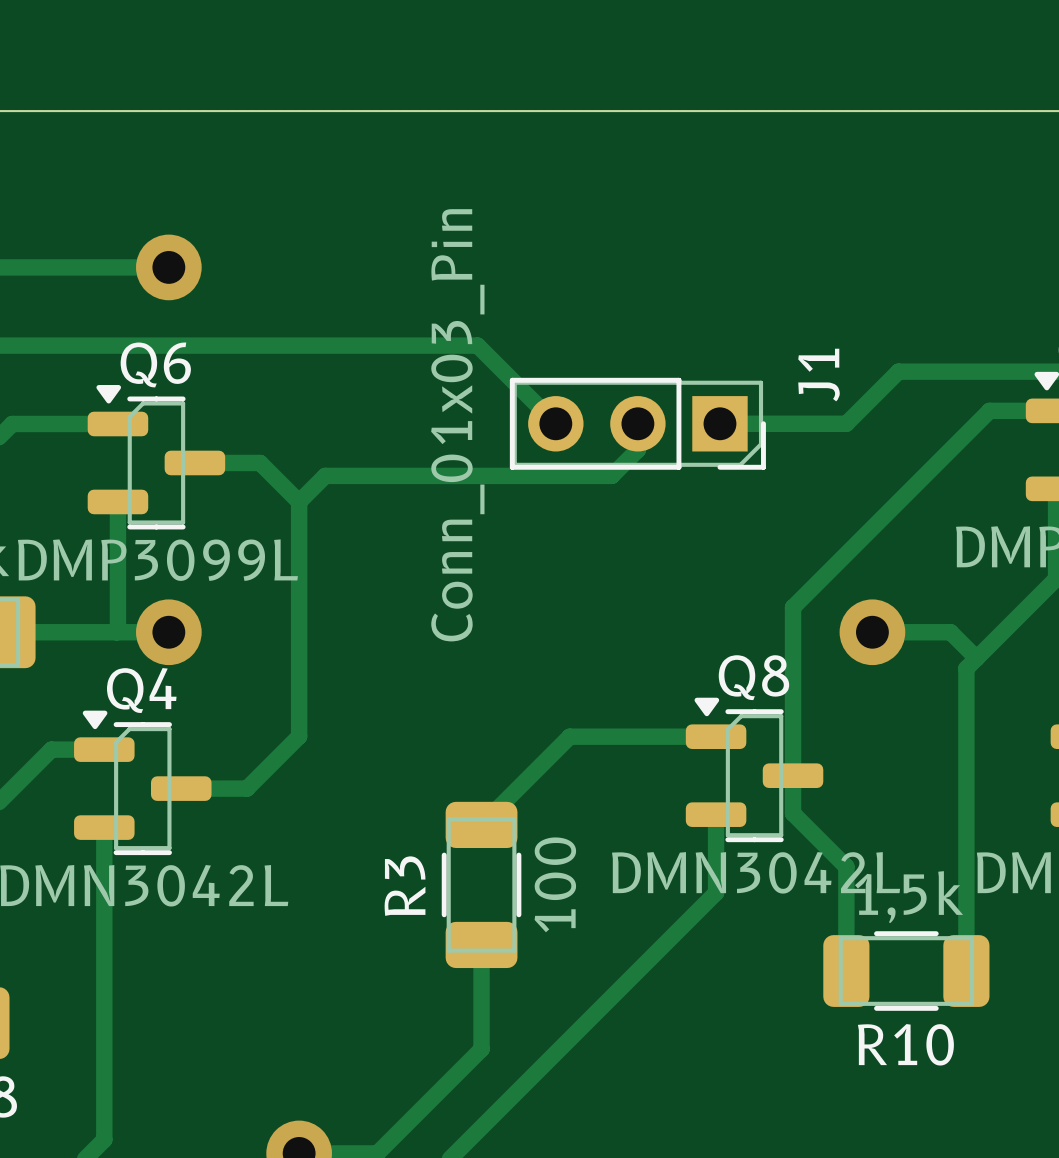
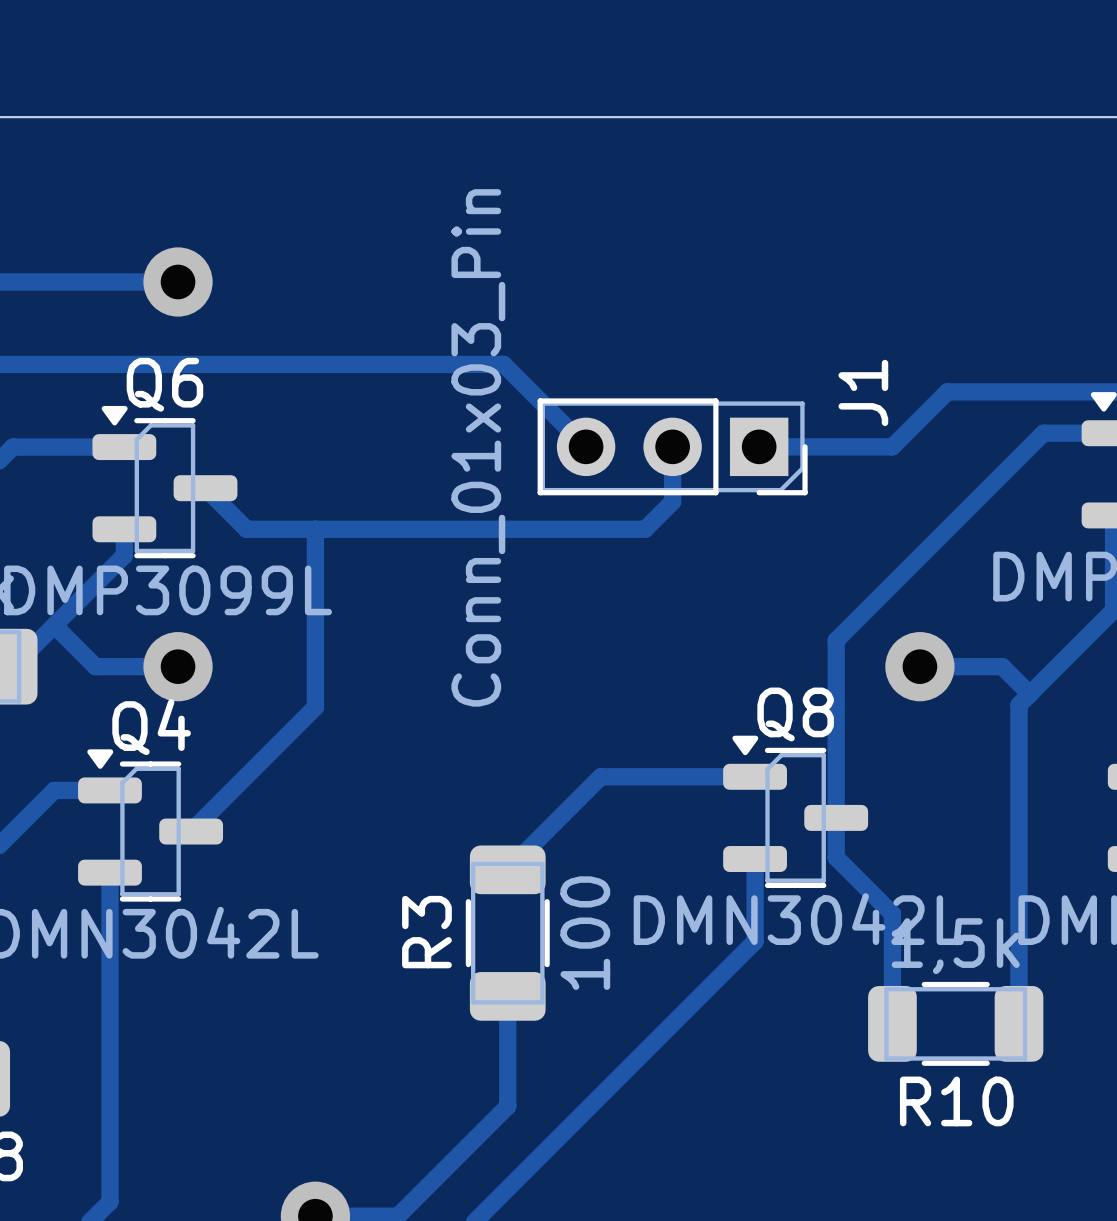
track: (637, 449) (611, 475) (325, 475) (299, 501) (260, 462) (194, 462) -> (672, 474) (672, 501) (645, 529) (246, 529) (205, 488)
track: (117, 526) (116, 632) -> (124, 555) (13, 666)
track: (12, 632) (90, 632) -> (54, 625) (95, 666)
track: (299, 670) (299, 736) (247, 788) (181, 788) -> (315, 707) (191, 831)

